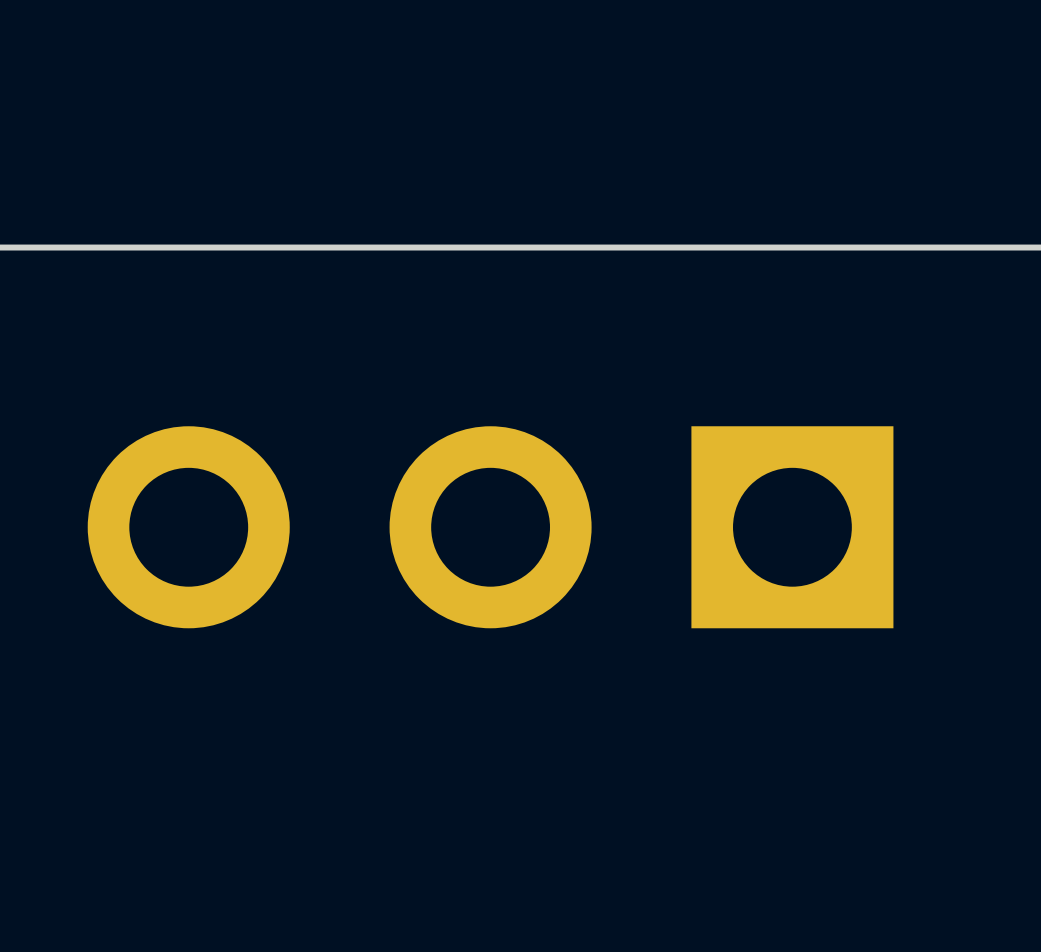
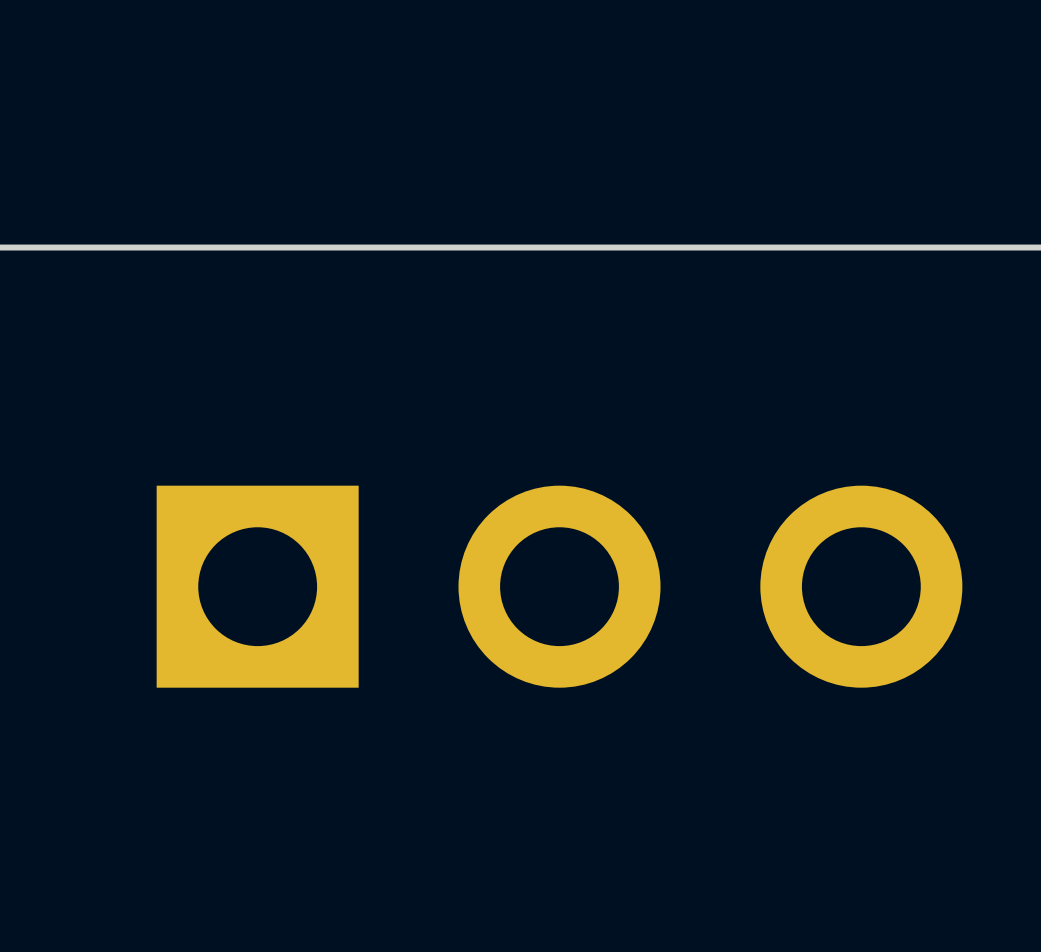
part rotation: 0° (490, 527) -> 180° (559, 586)

